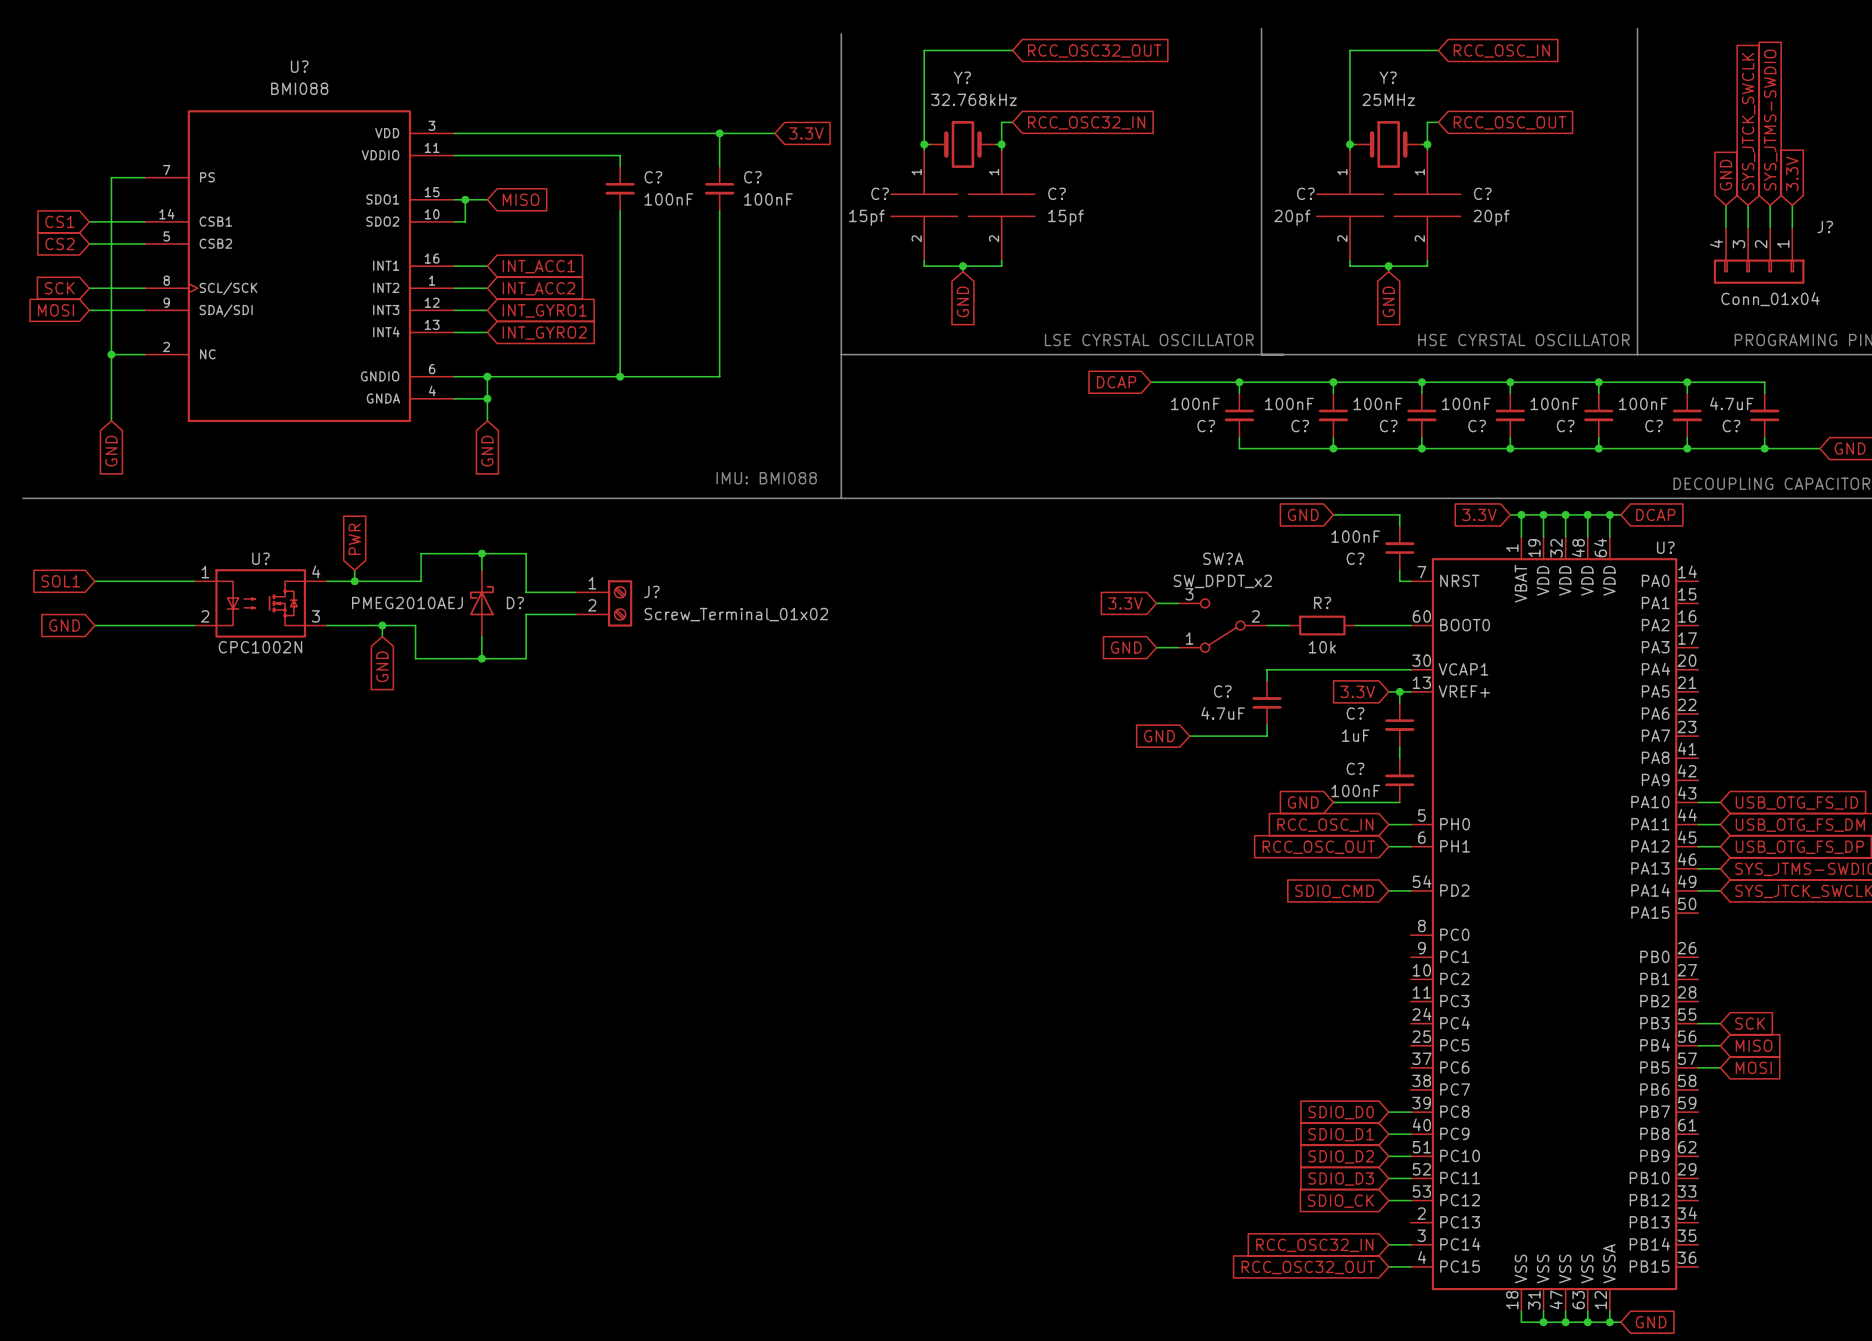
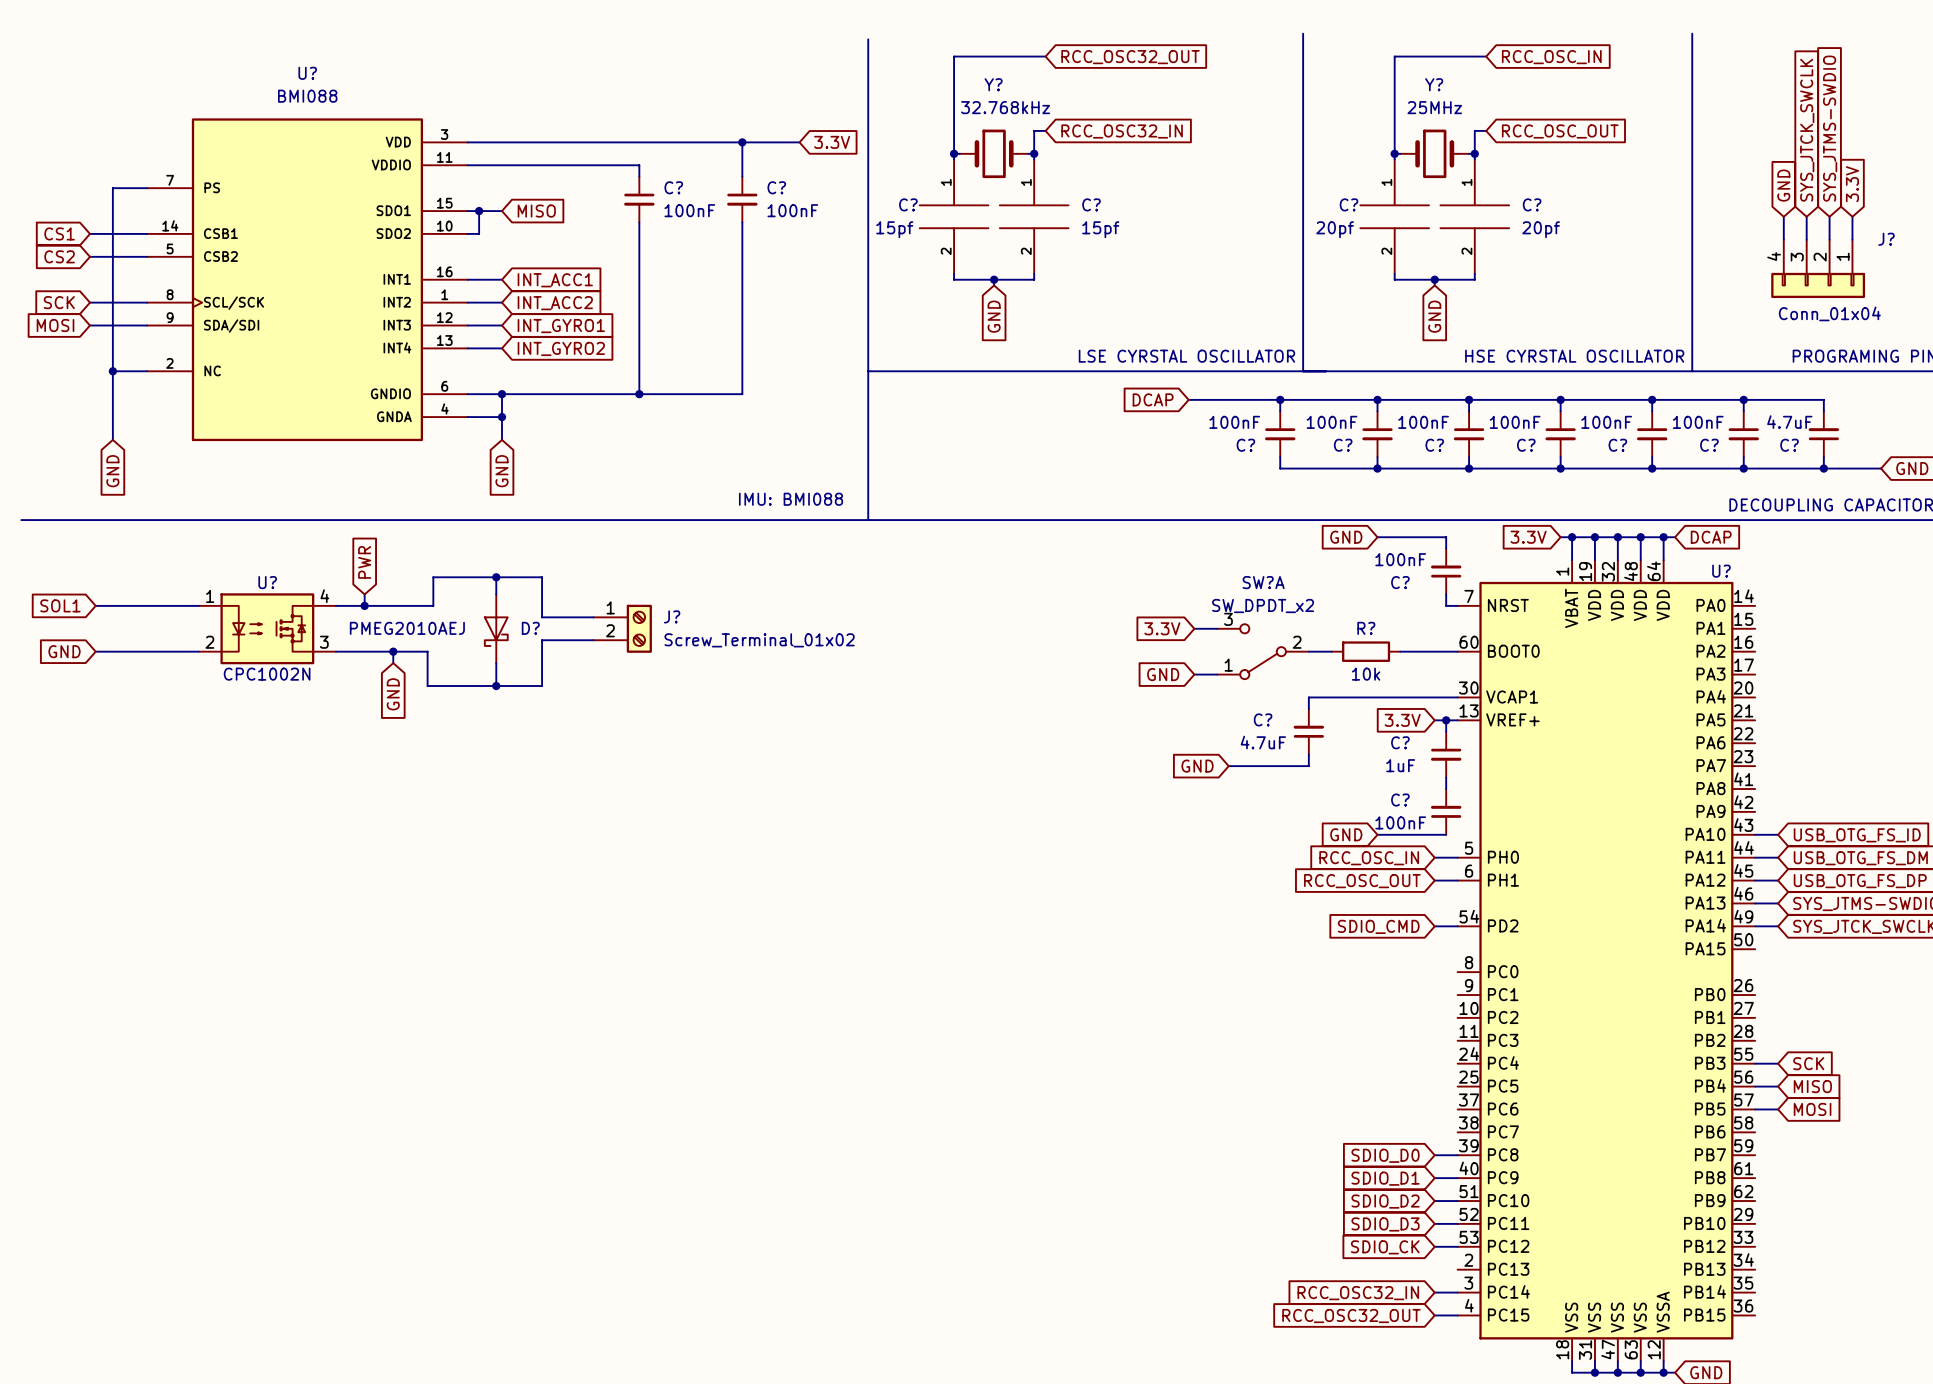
D? rotation: 0° (481, 600) -> 180° (496, 631)
D? value position: PMEG2010AEJ (407, 603) -> PMEG2010AEJ (407, 628)

